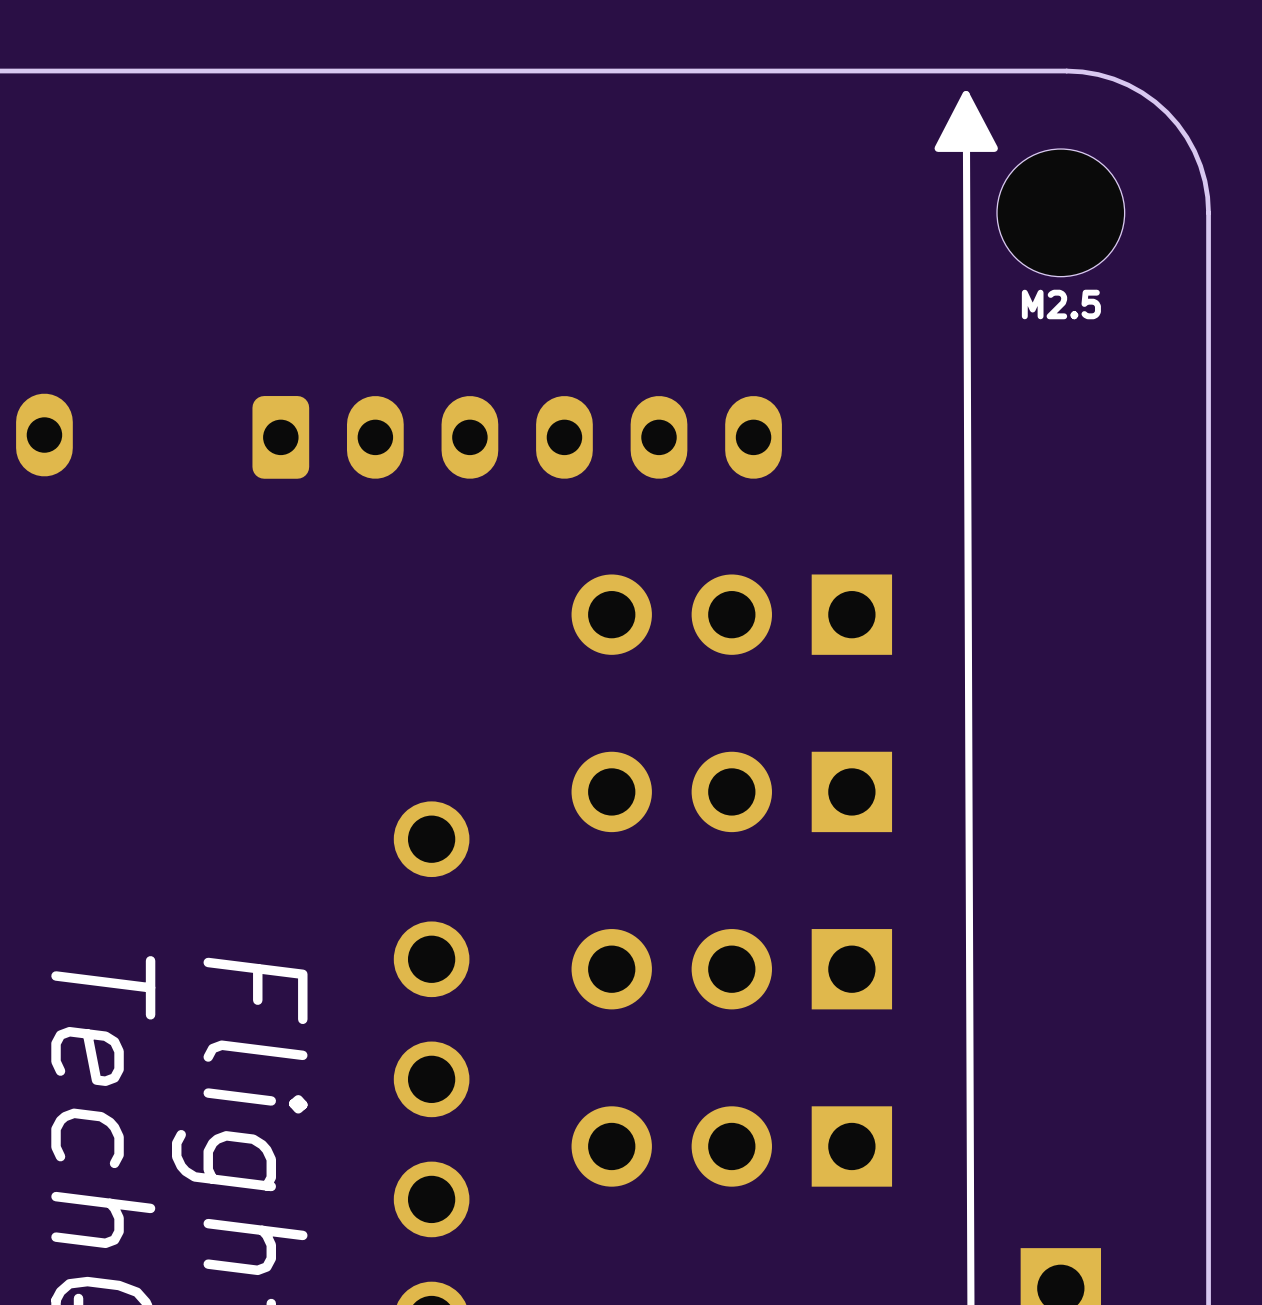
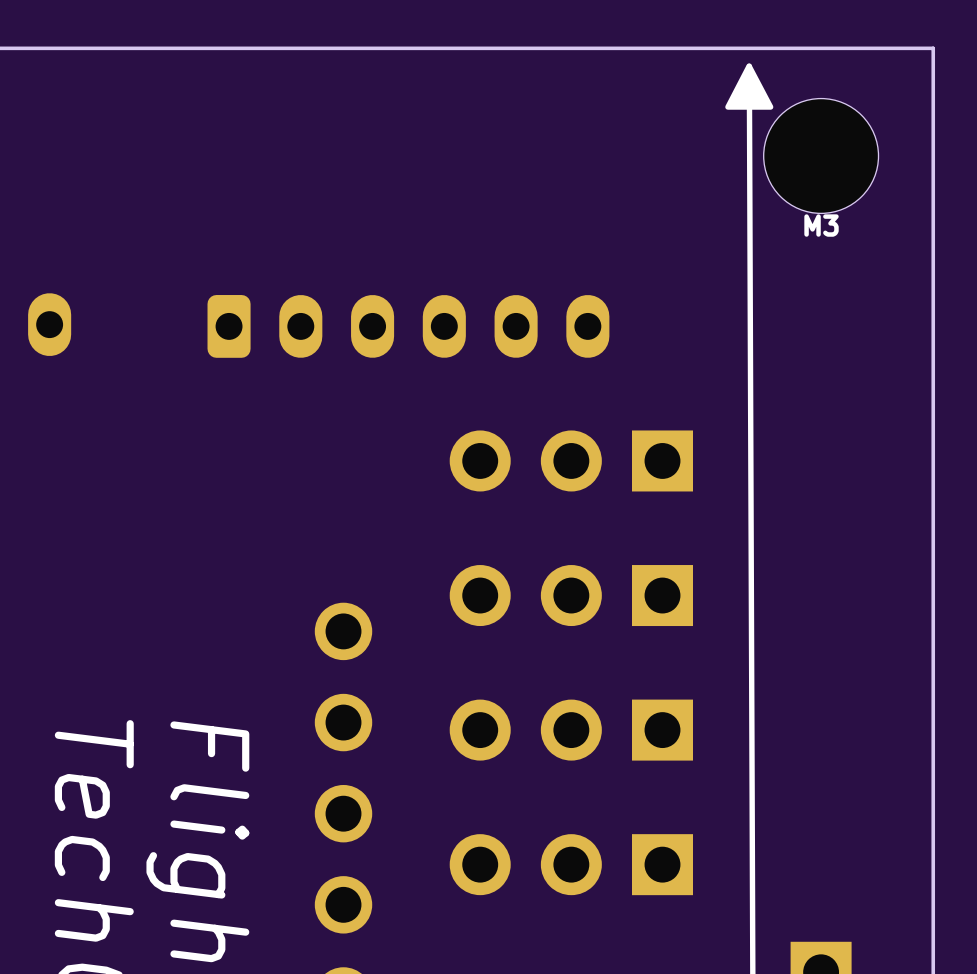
board edge: (1066, 71) (1082, 71) (1113, 78) (1142, 92) (1167, 112) (1177, 124) (1194, 151) (1204, 181) (1208, 212) -> (825, 48) (933, 48) (933, 155)
part footprint: [997, 149, 1125, 277] -> [763, 98, 879, 214]
text: M2.5 (1061, 304) -> M3 (821, 225)

